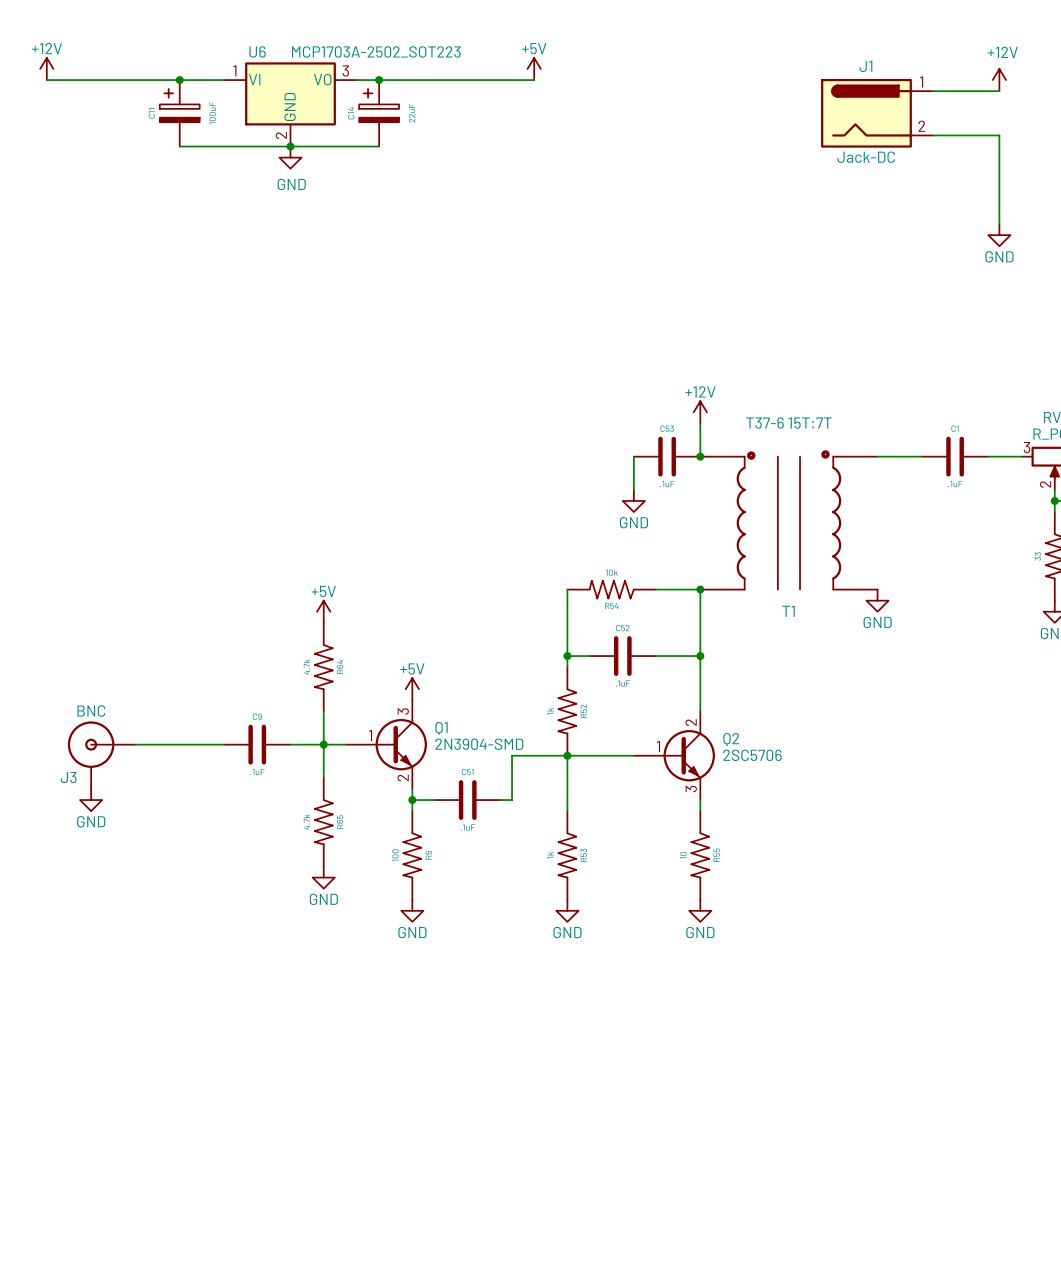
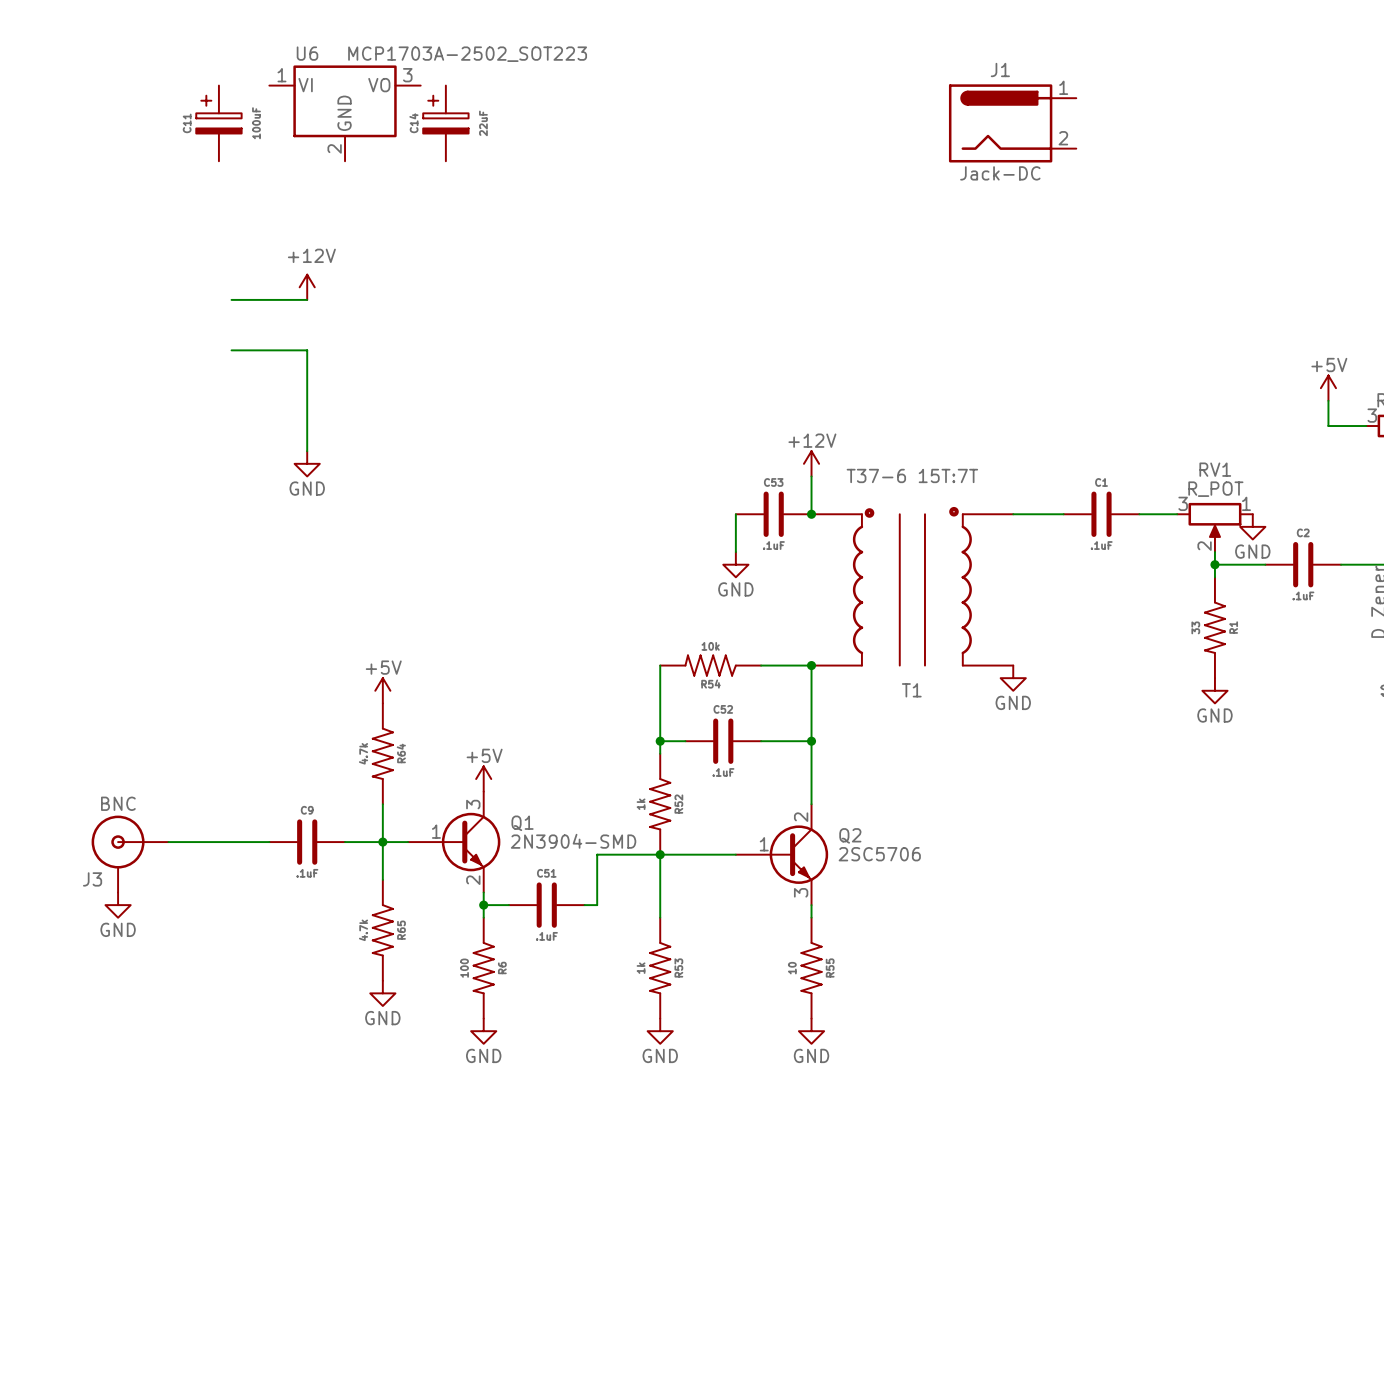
power symbol: +12V (46, 68) -> none
power symbol: +5V (534, 68) -> none
wire: (46, 80) (224, 80) -> none
junction: (179, 80) -> none
wire: (356, 80) (534, 80) -> none
junction: (379, 80) -> none
power symbol: +12V (999, 80) -> none
wire: (932, 91) (999, 91) -> none
wire: (932, 135) (999, 135) (999, 224) -> none
wire: (179, 146) (379, 146) -> none
junction: (290, 146) -> none
power symbol: GND (290, 157) -> none
power symbol: GND (999, 235) -> none
power symbol: none -> +12V (307, 287)
wire: none -> (231, 299) (307, 299)
wire: none -> (231, 350) (307, 350) (307, 451)
power symbol: none -> GND (307, 463)

